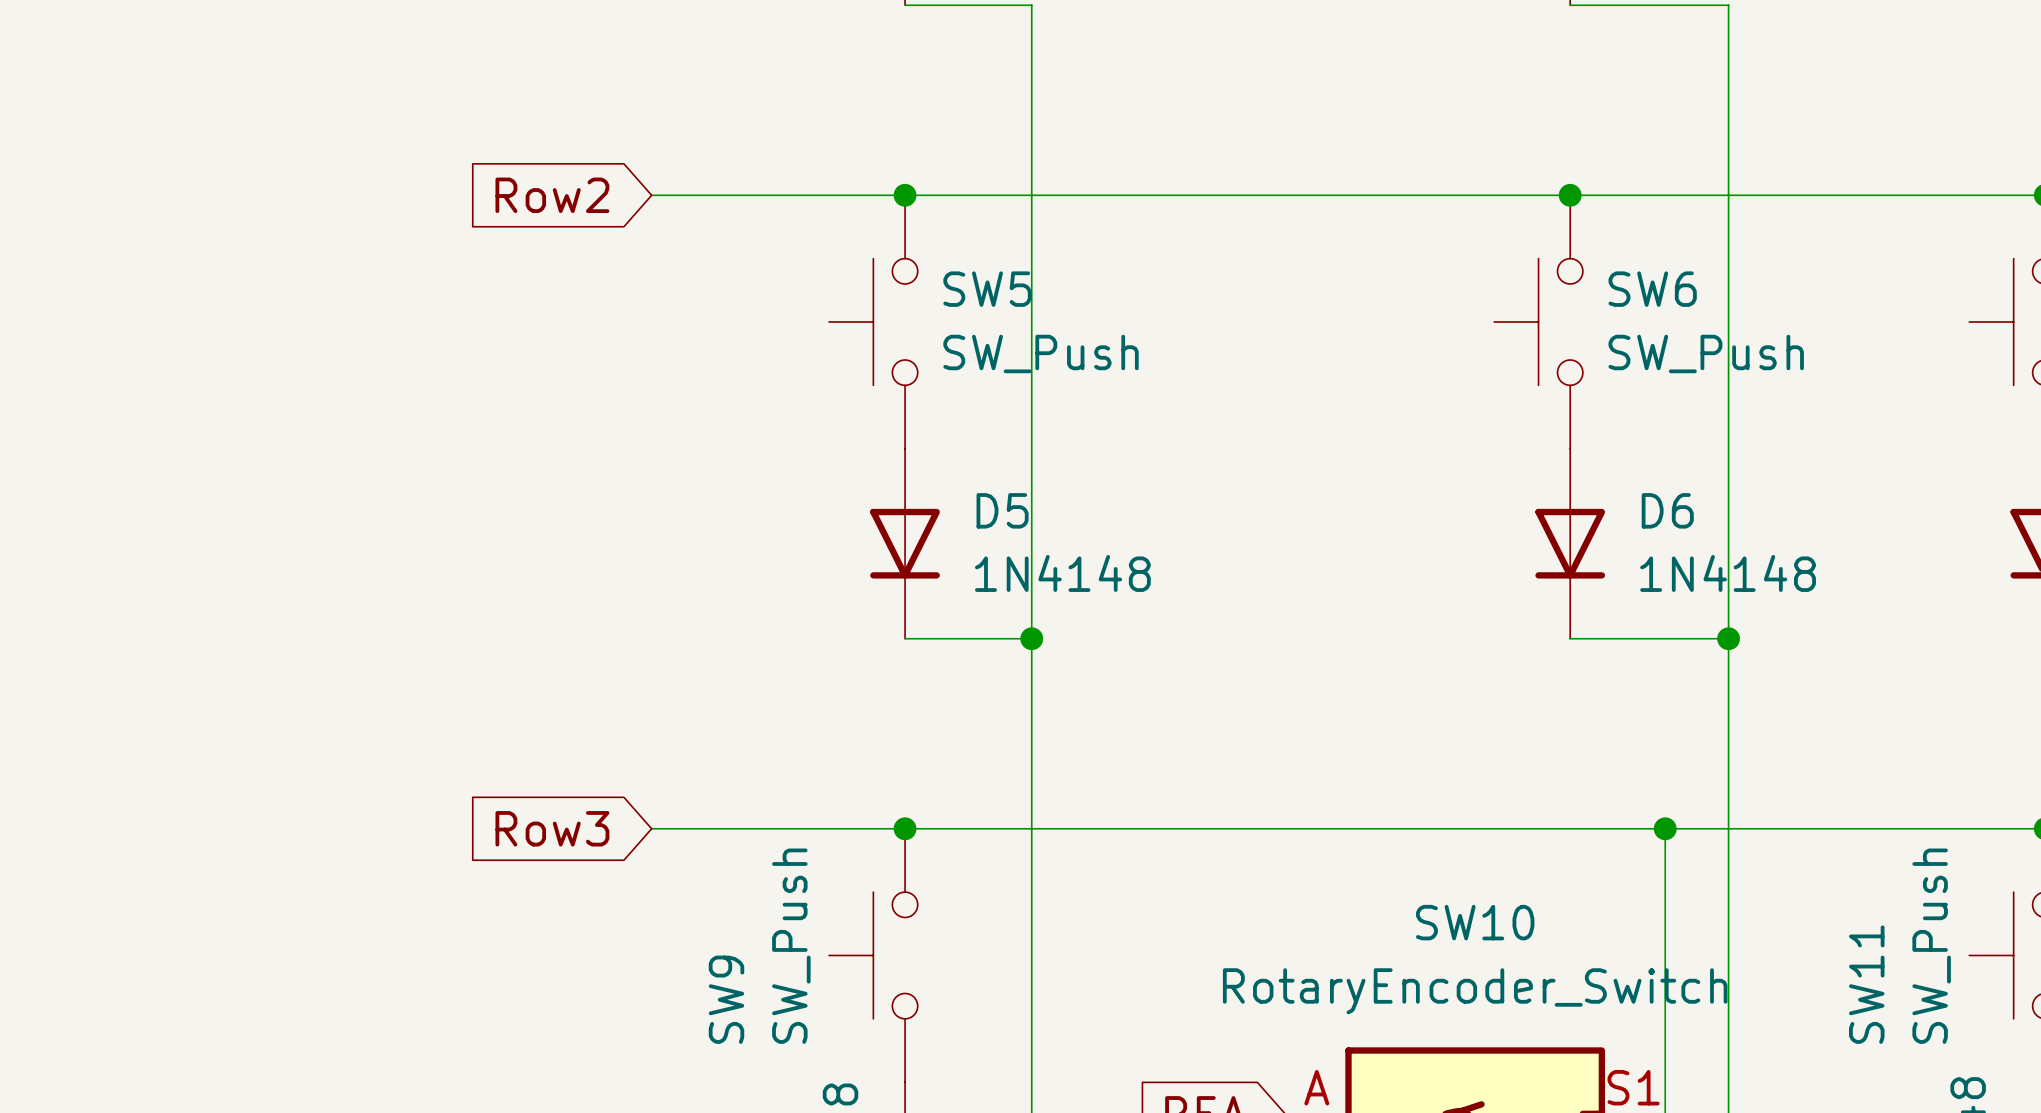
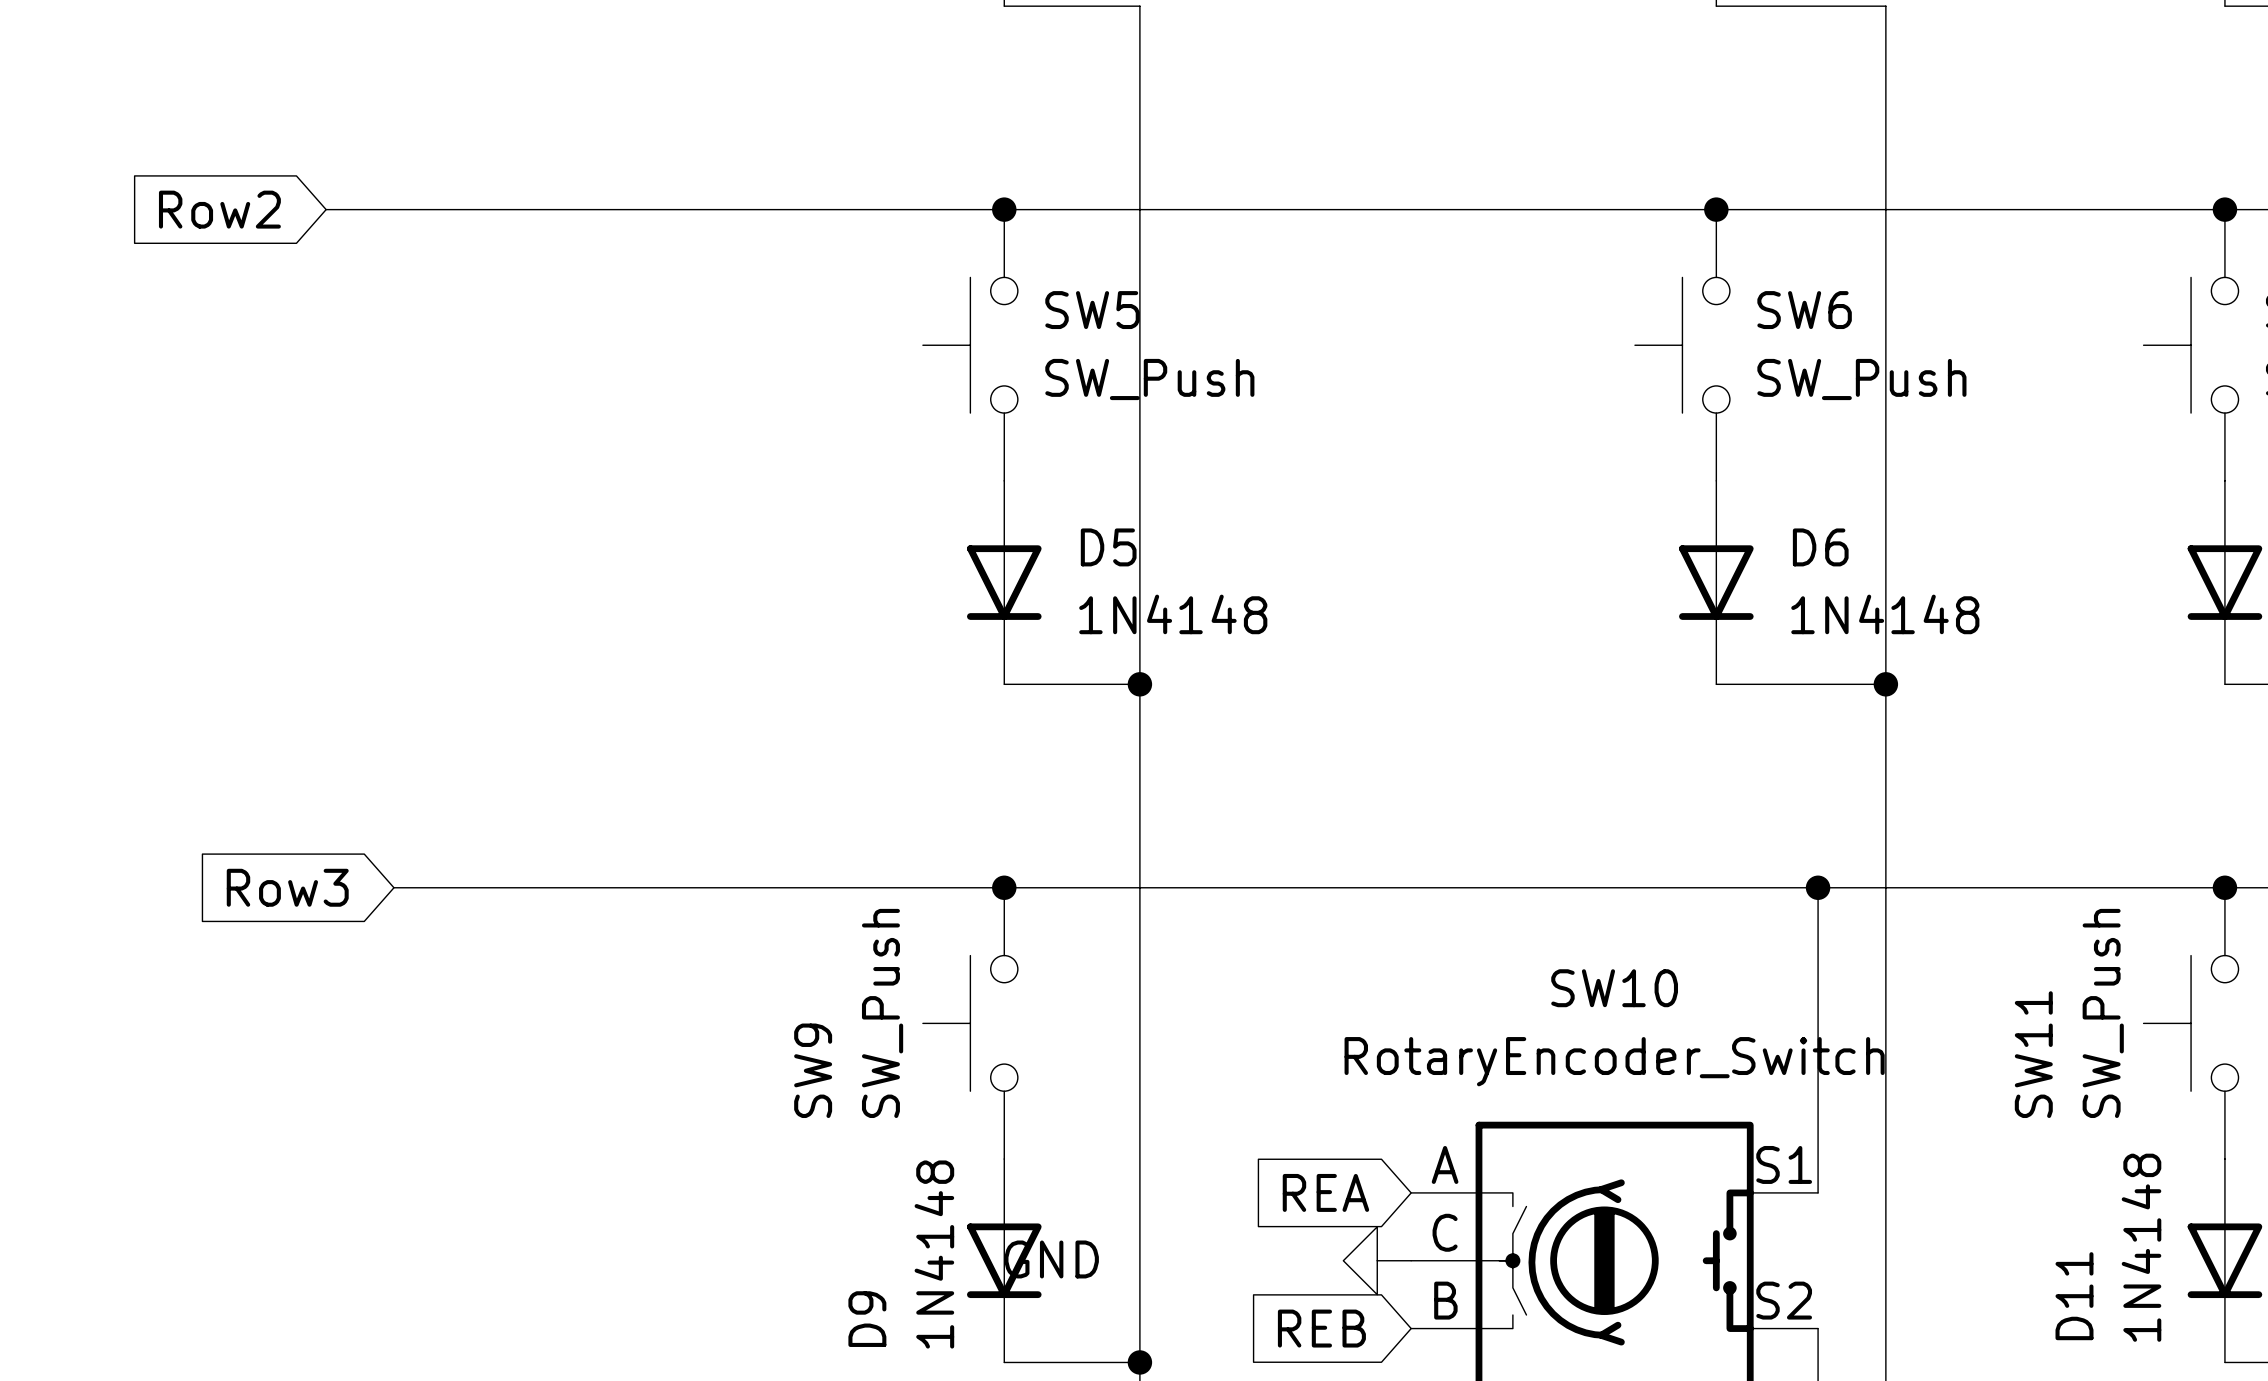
wire: none -> (326, 209) (733, 209)
global label position: Row2 (552, 195) -> Row2 (219, 209)
wire: none -> (393, 887) (733, 887)
global label position: Row3 (552, 828) -> Row3 (287, 887)

